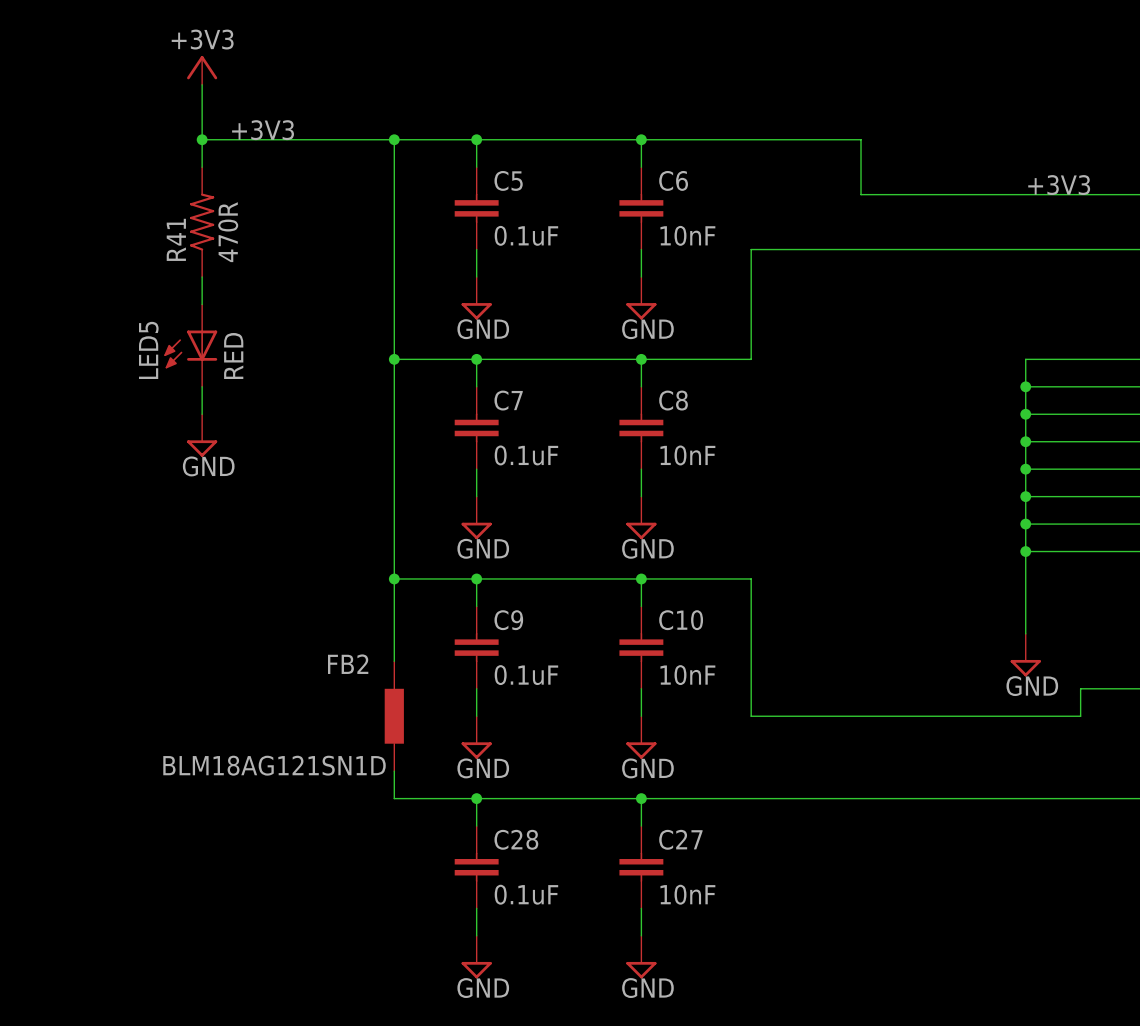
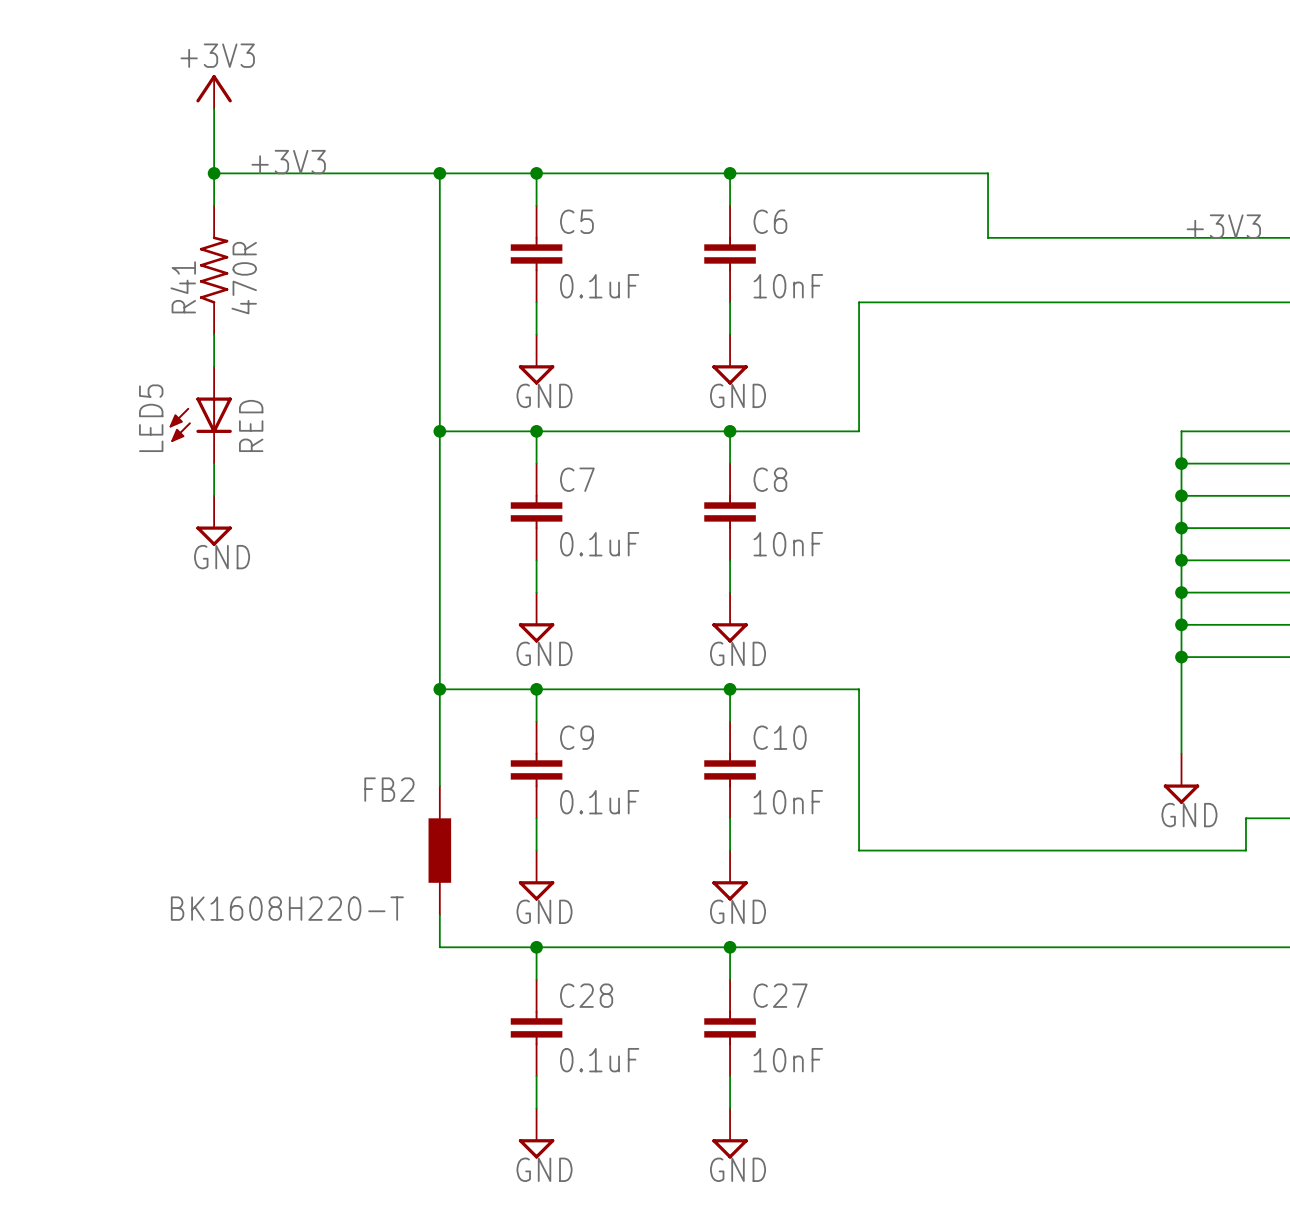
FB2 value: BLM18AG121SN1D (274, 765) -> BK1608H220-T (287, 908)

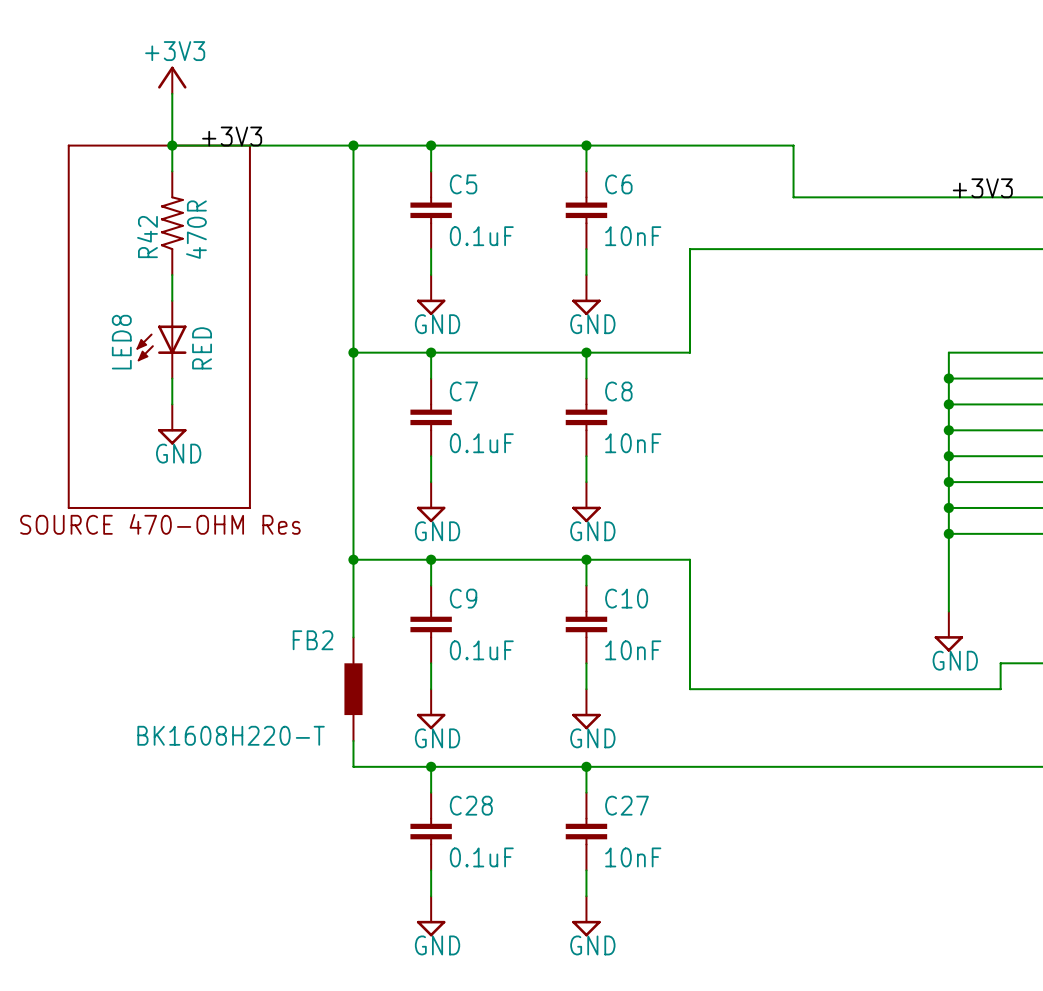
line: none -> (68, 145) (249, 145) (249, 507) (68, 507) (68, 145)
R41 name: R41 (183, 287) -> R42 (147, 237)
LED5 name: LED5 (151, 418) -> LED8 (121, 342)
text: none -> SOURCE 470-OHM Res (160, 524)

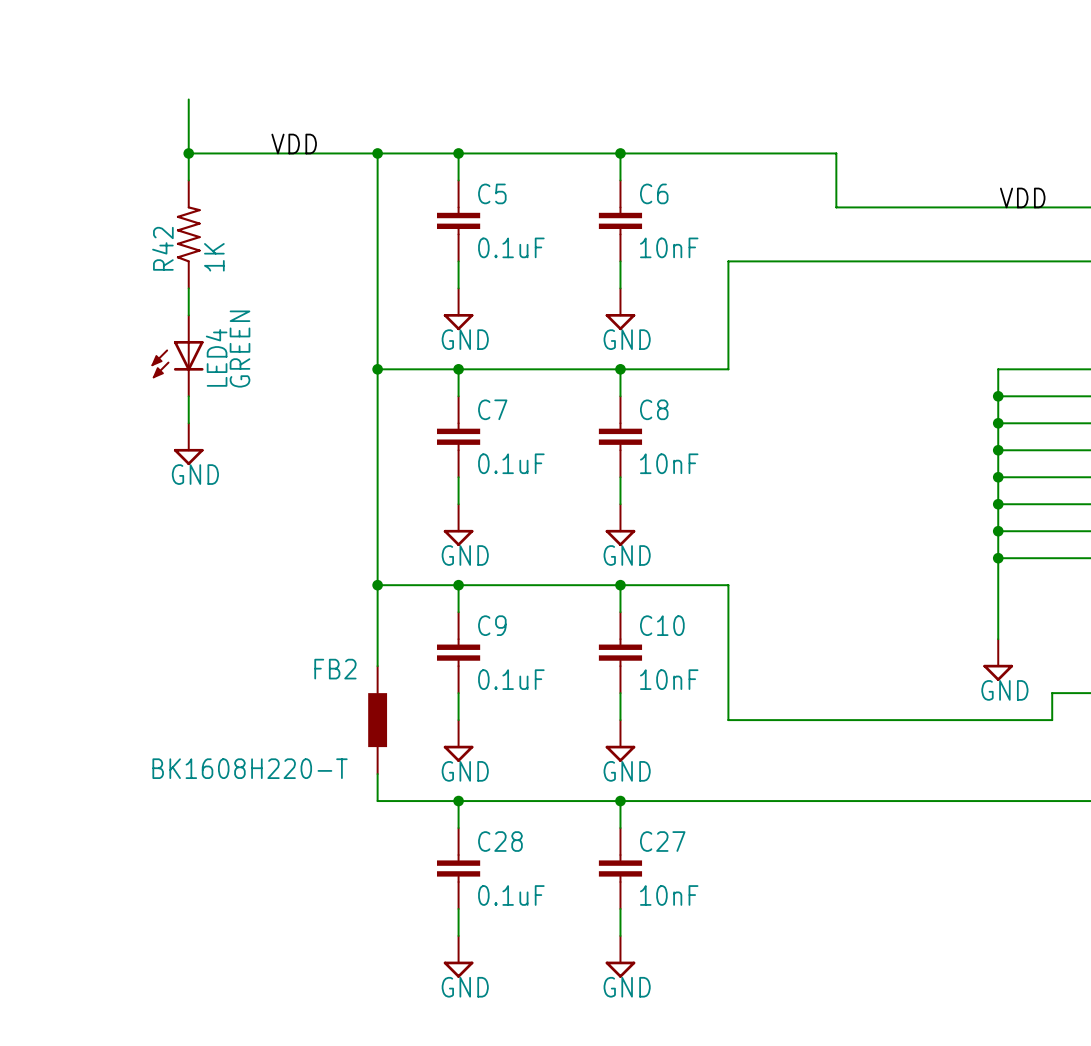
power symbol: +3V3 (172, 80) -> none
label: +3V3 (232, 136) -> none
label: none -> VDD (294, 144)
line: (68, 145) (249, 145) (249, 507) (68, 507) (68, 145) -> none
label: +3V3 (982, 188) -> VDD (1022, 197)
R42 value: 470R (196, 229) -> 1K (214, 257)
LED8 name: LED8 (121, 342) -> LED4 (216, 357)
LED8 value: RED (202, 348) -> GREEN (240, 349)
text: SOURCE 470-OHM Res (160, 524) -> none

